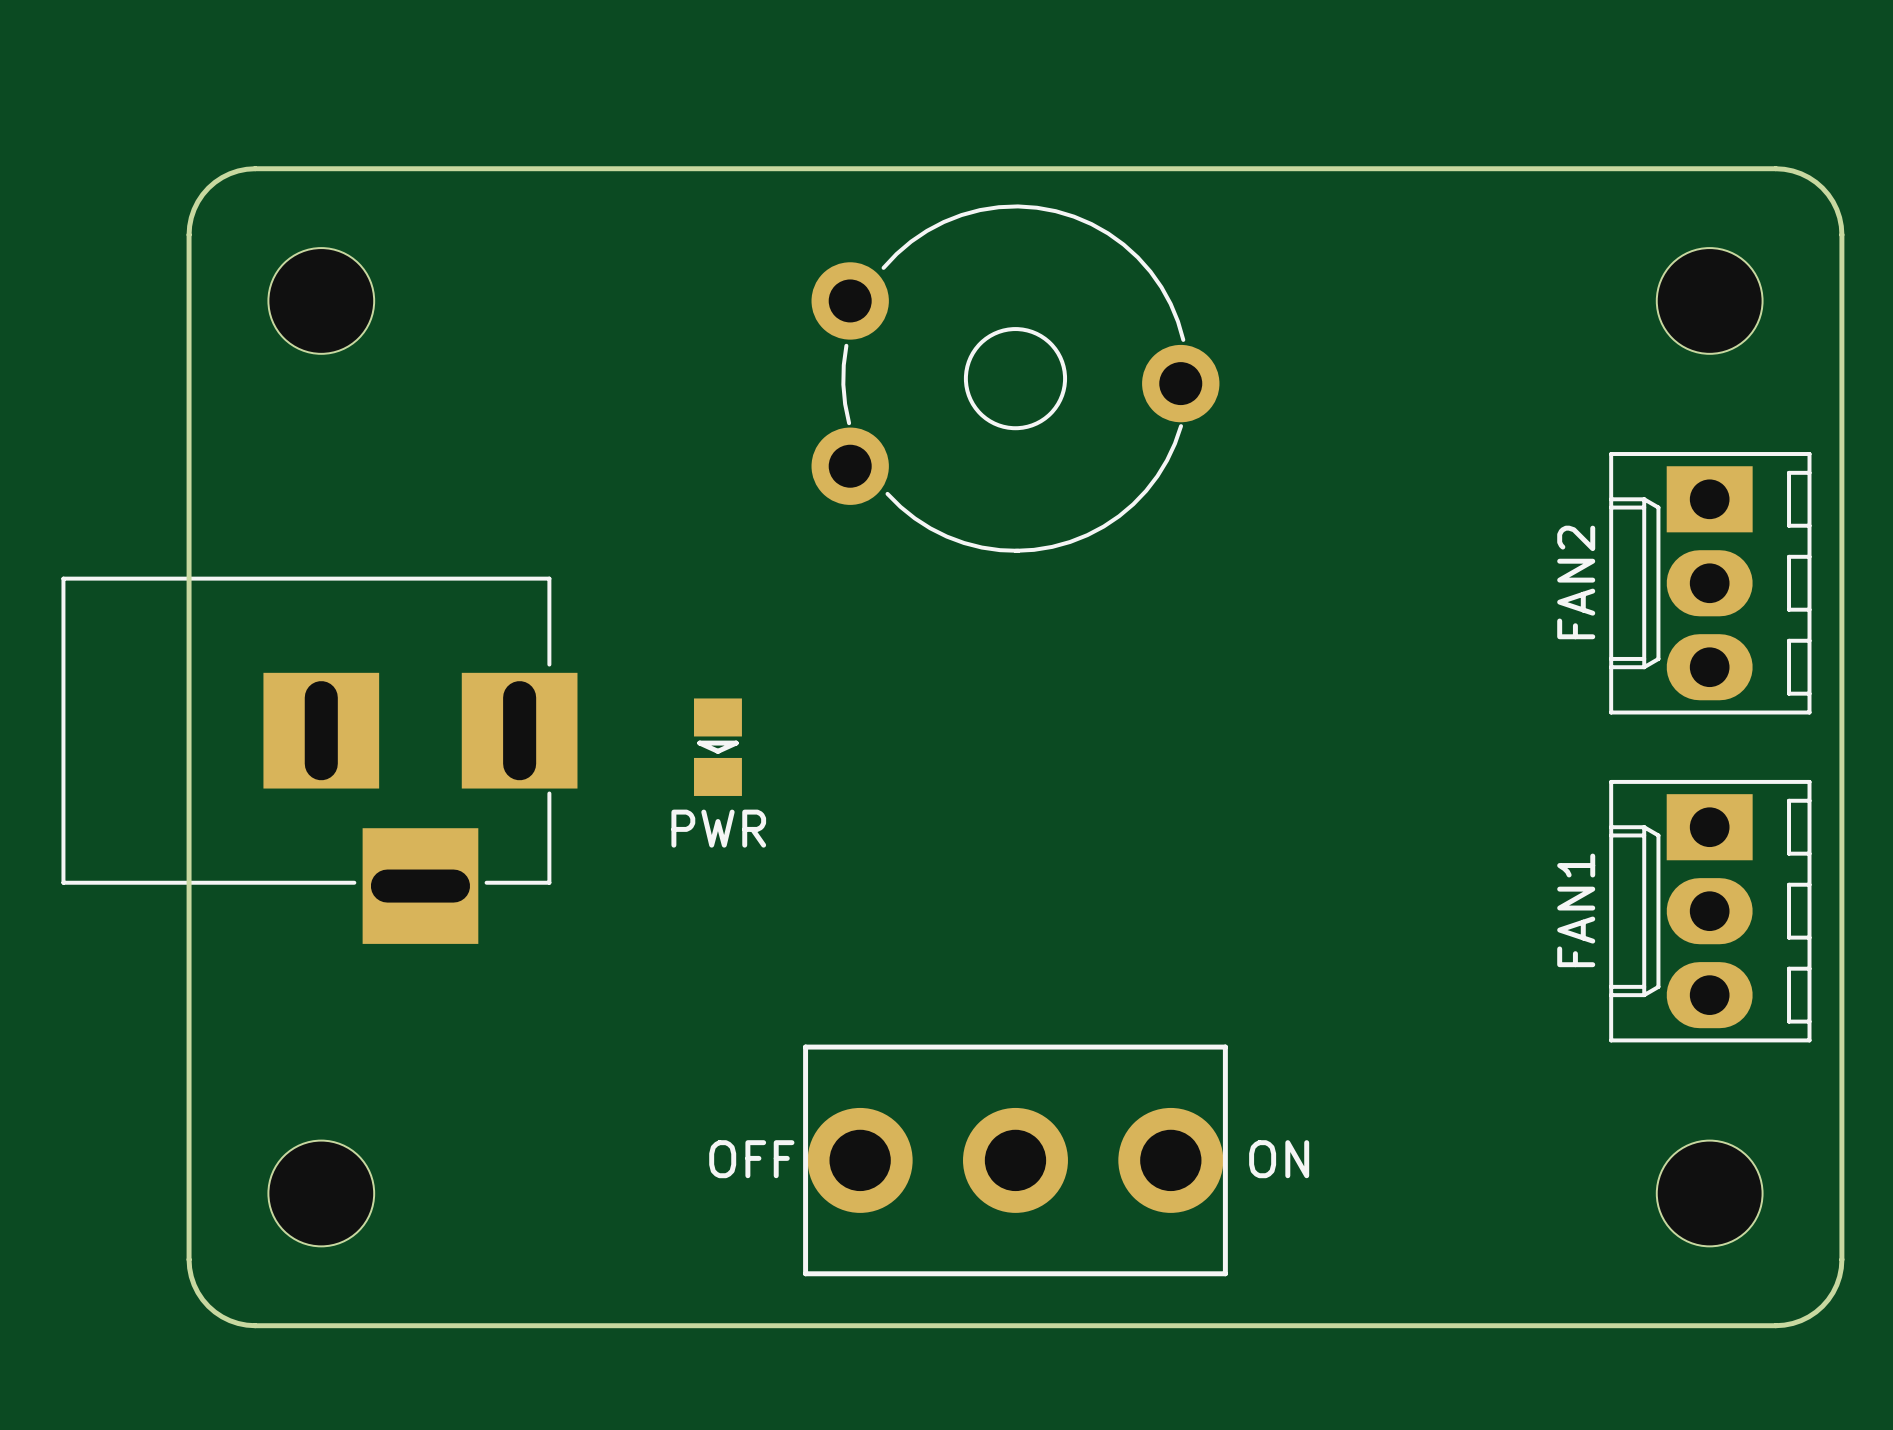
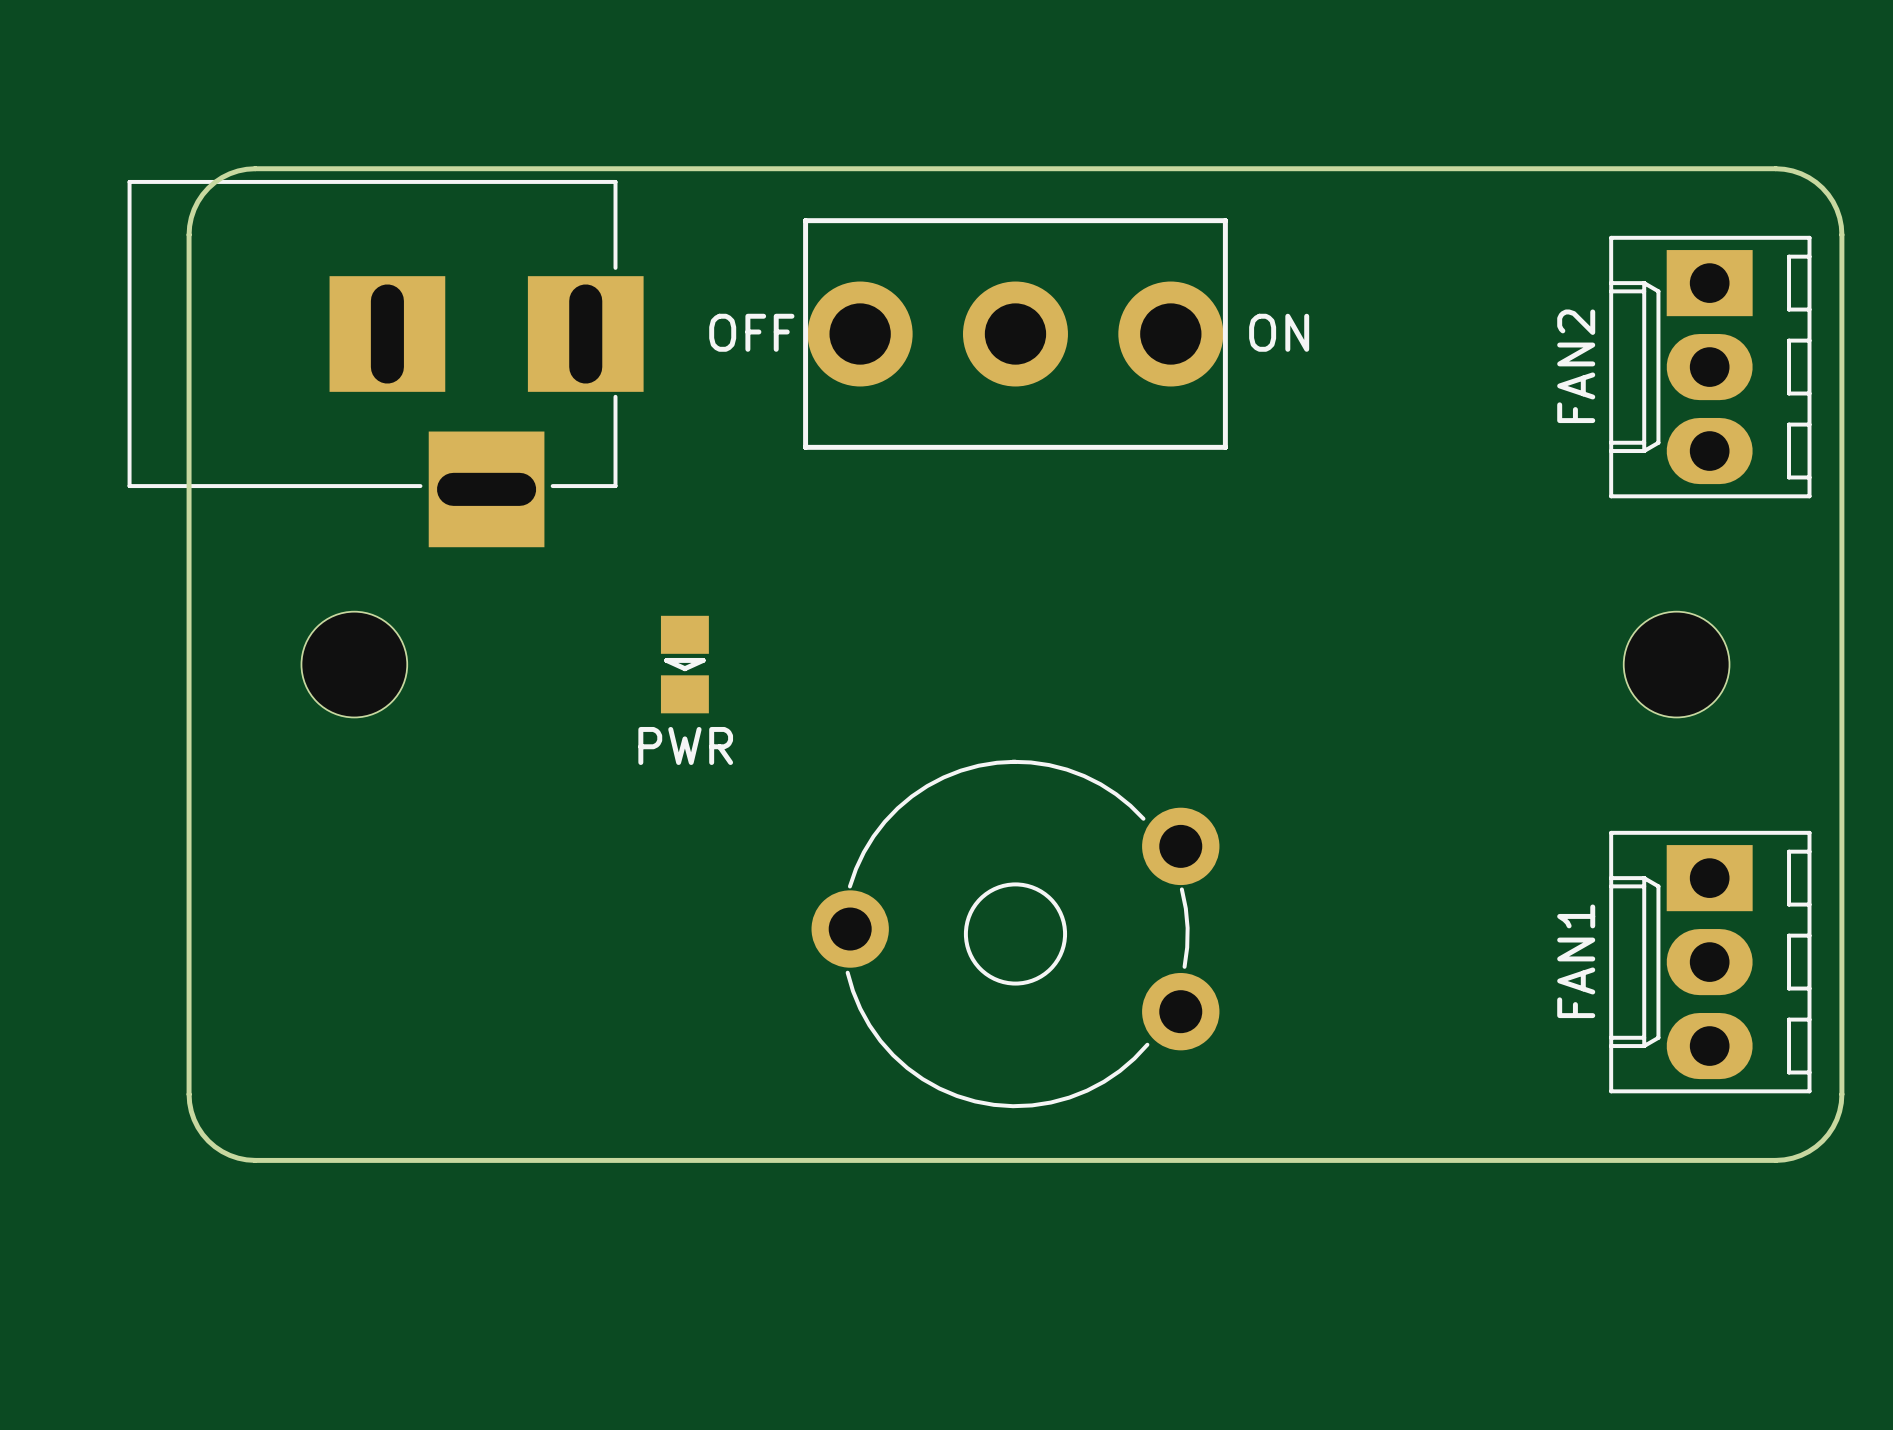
part: (321, 300) -> none
part: (1709, 300) -> none
part rotation: 0° (1015, 378) -> 180° (1015, 933)
part position: (1015, 378) -> (1015, 933)
part position: (1710, 583) -> (1710, 367)
part: none -> (354, 664)
part: none -> (1676, 664)
PWR position: (717, 747) -> (684, 664)
part position: (319, 760) -> (385, 363)
part position: (1710, 911) -> (1710, 962)
board edge: (189, 1094) (189, 1259) (191, 1276) (202, 1299) (214, 1312) (229, 1320) (255, 1325) (1784, 1325) (1801, 1320) (1816, 1312) (1833, 1292) (1839, 1276) (1841, 1259) (1841, 1094) -> (189, 1094) (194, 1119) (208, 1141) (229, 1155) (255, 1160) (1775, 1160) (1801, 1155) (1822, 1141) (1836, 1119) (1841, 1094)
ON position: (1015, 1160) -> (1015, 334)
part: (321, 1193) -> none
part: (1709, 1193) -> none

